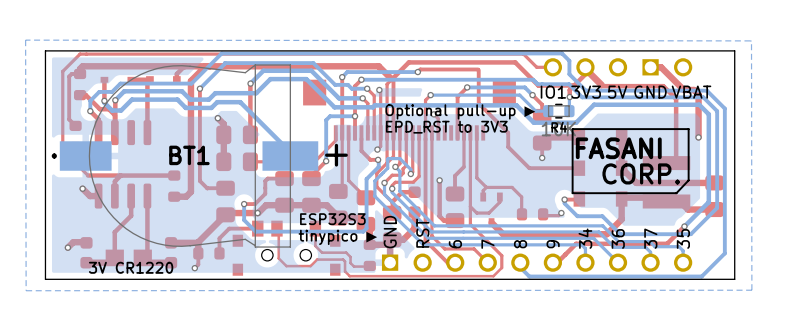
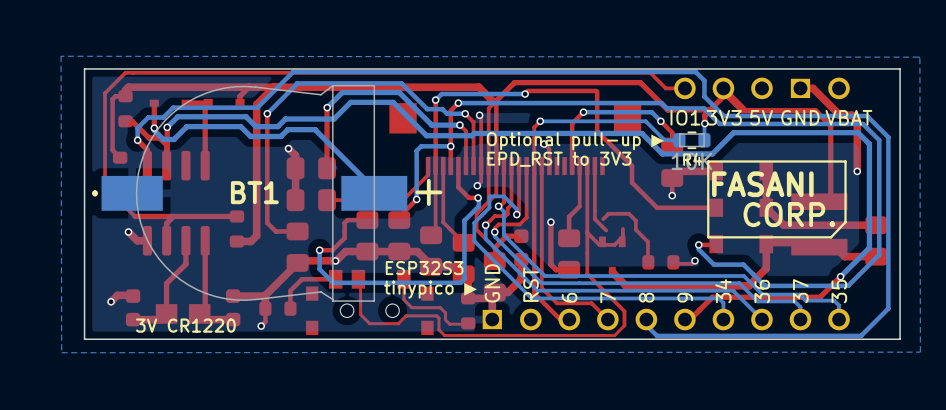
top track: none -> (622, 228) (622, 236) (614, 244) (599, 244) (587, 232)
top track: (512, 187) (486, 187) (483, 190) (483, 197) -> (636, 230) (635, 220) (629, 213) (608, 213) (603, 219)
top track: (499, 197) (499, 202) (488, 213) (476, 213) (470, 206) -> none

